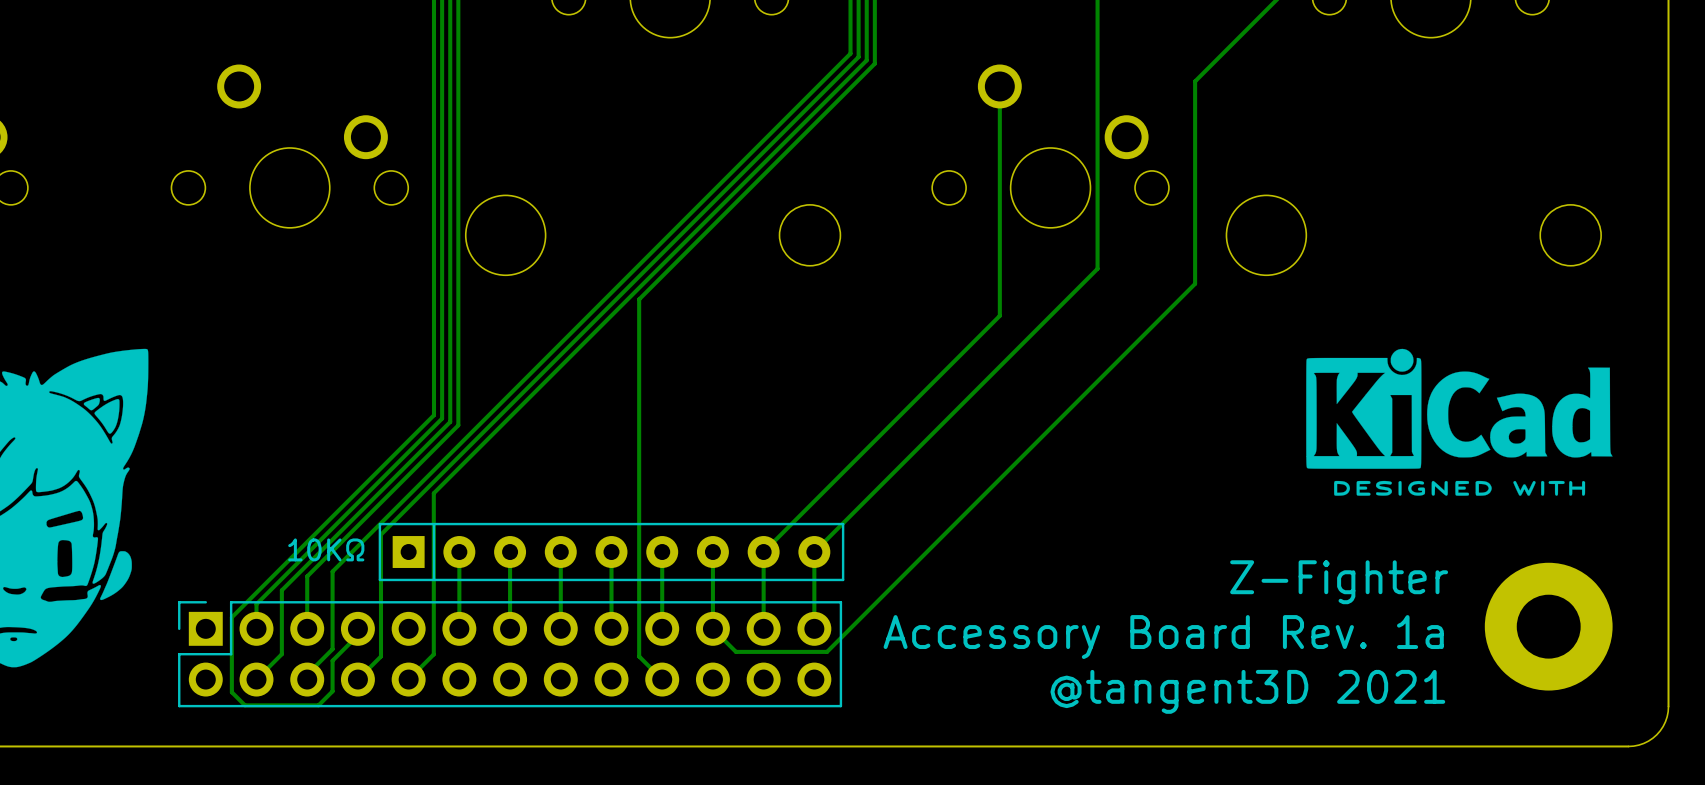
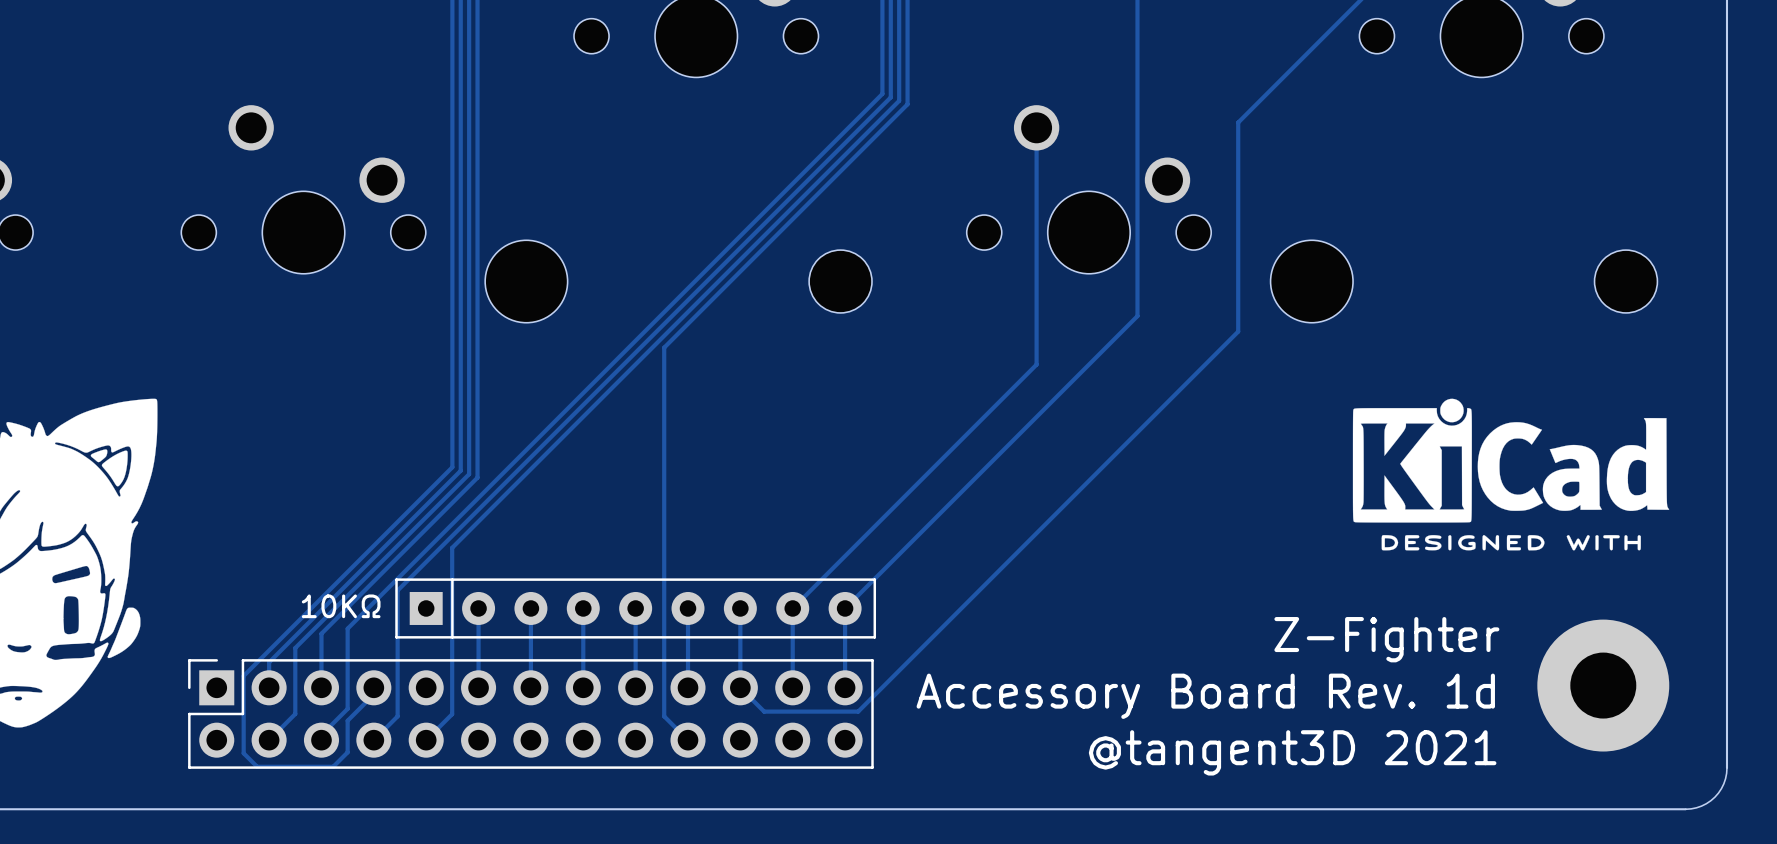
text: Accessory Board Rev. 1a (1163, 637) -> Accessory Board Rev. 1d (1205, 696)

